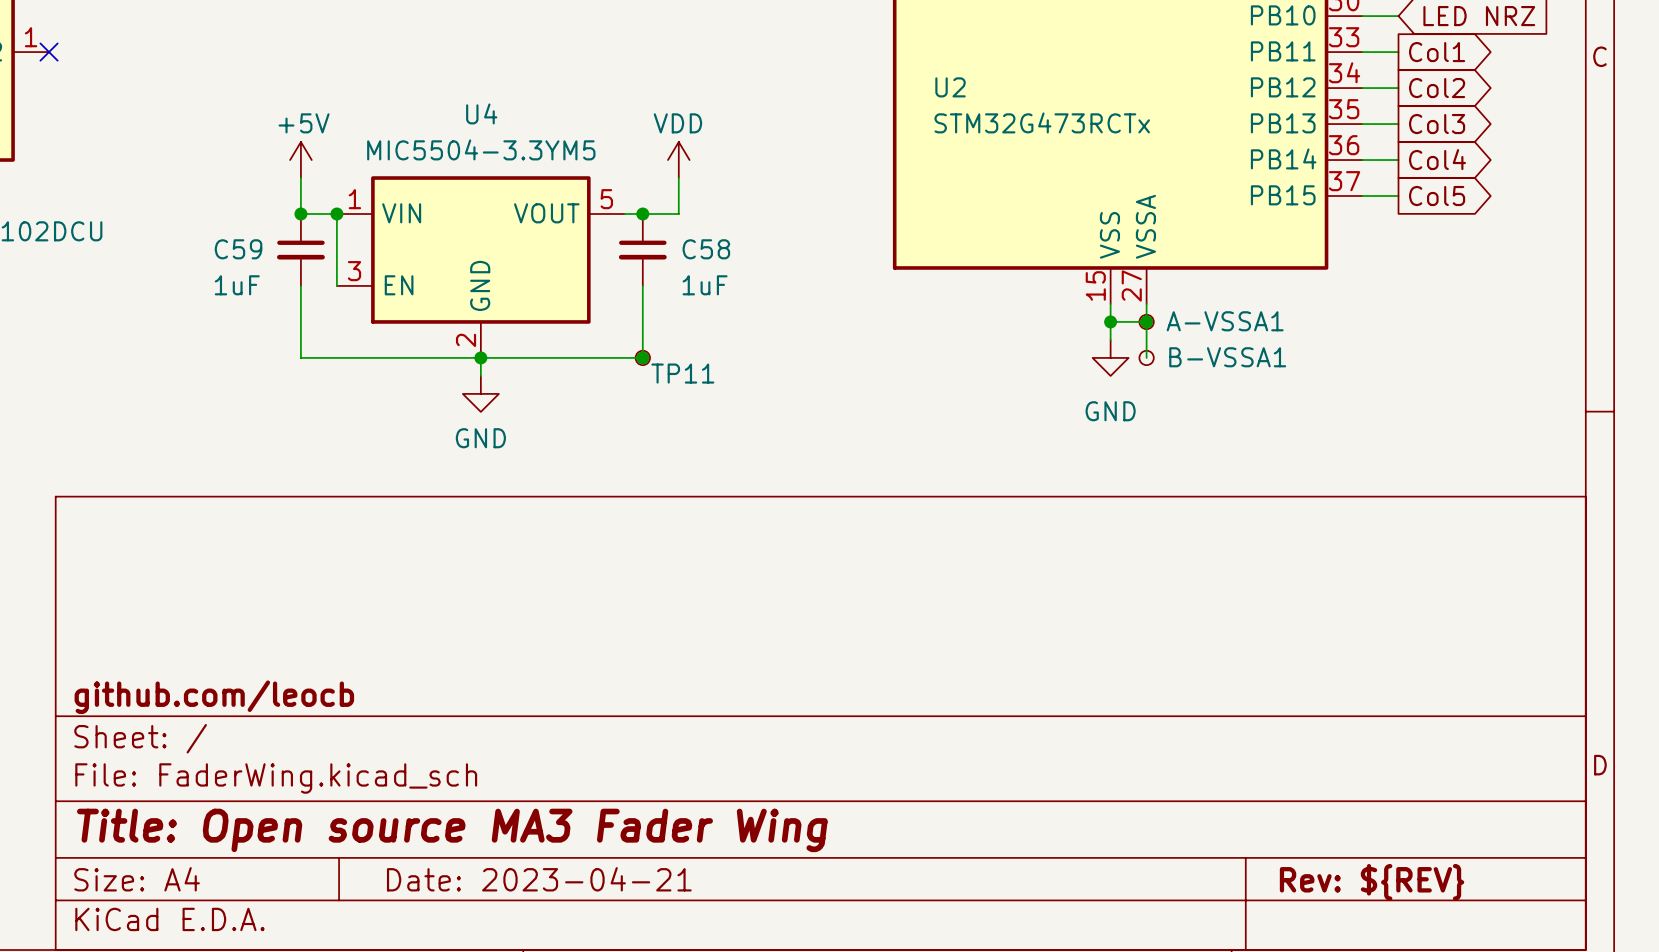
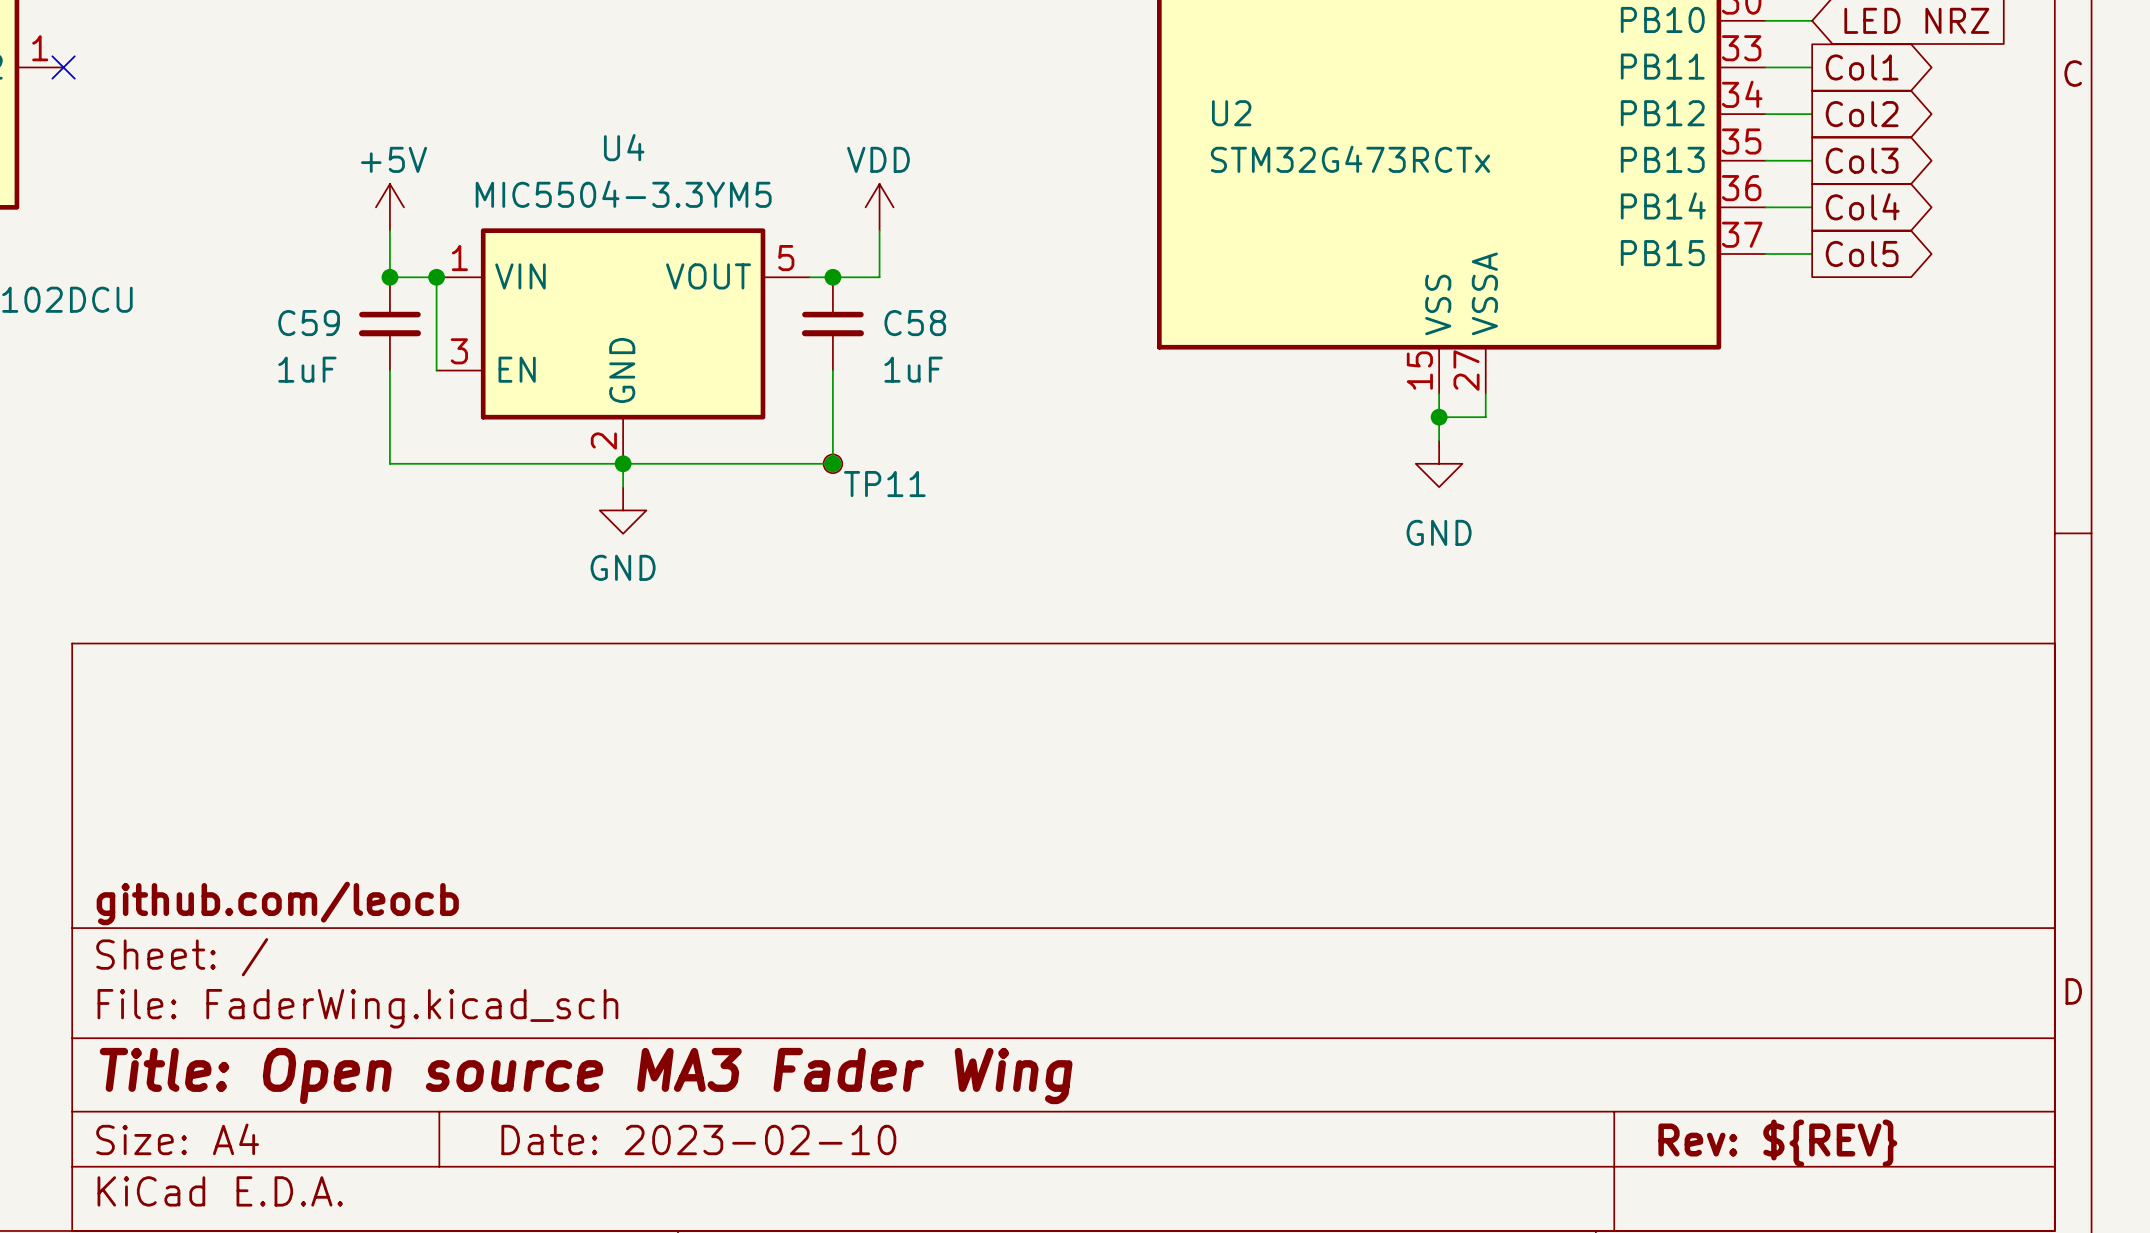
wire: (1146, 321) (1146, 357) -> none
junction: (1146, 321) -> none
A-VSSA1: (1146, 321) -> none
B-VSSA1: (1146, 357) -> none
title block: Date: 2023-04-21 (539, 879) -> Date: 2023-02-10 (698, 1140)

